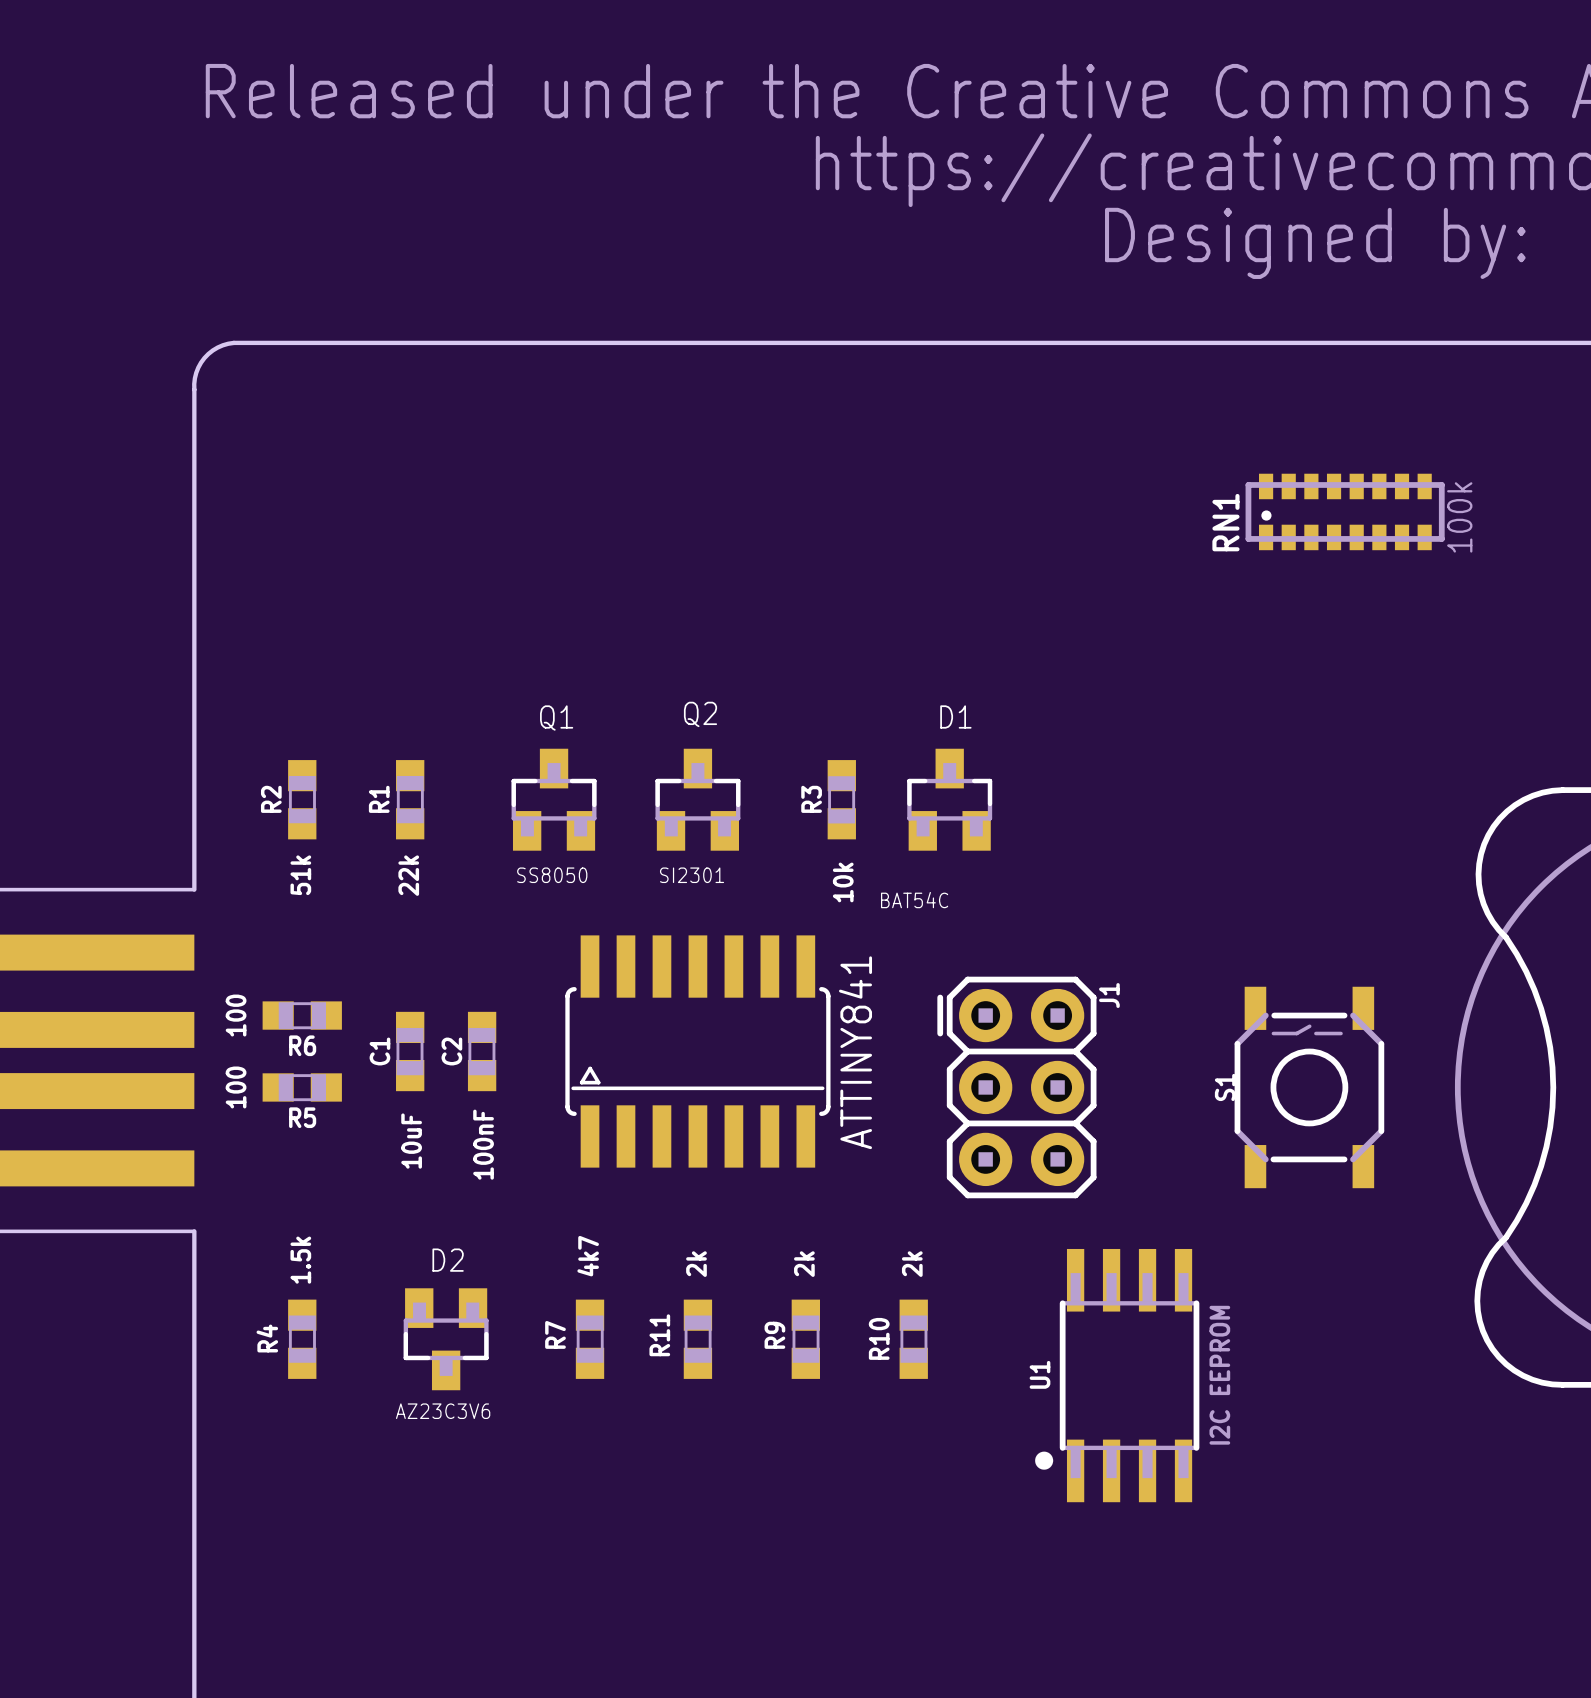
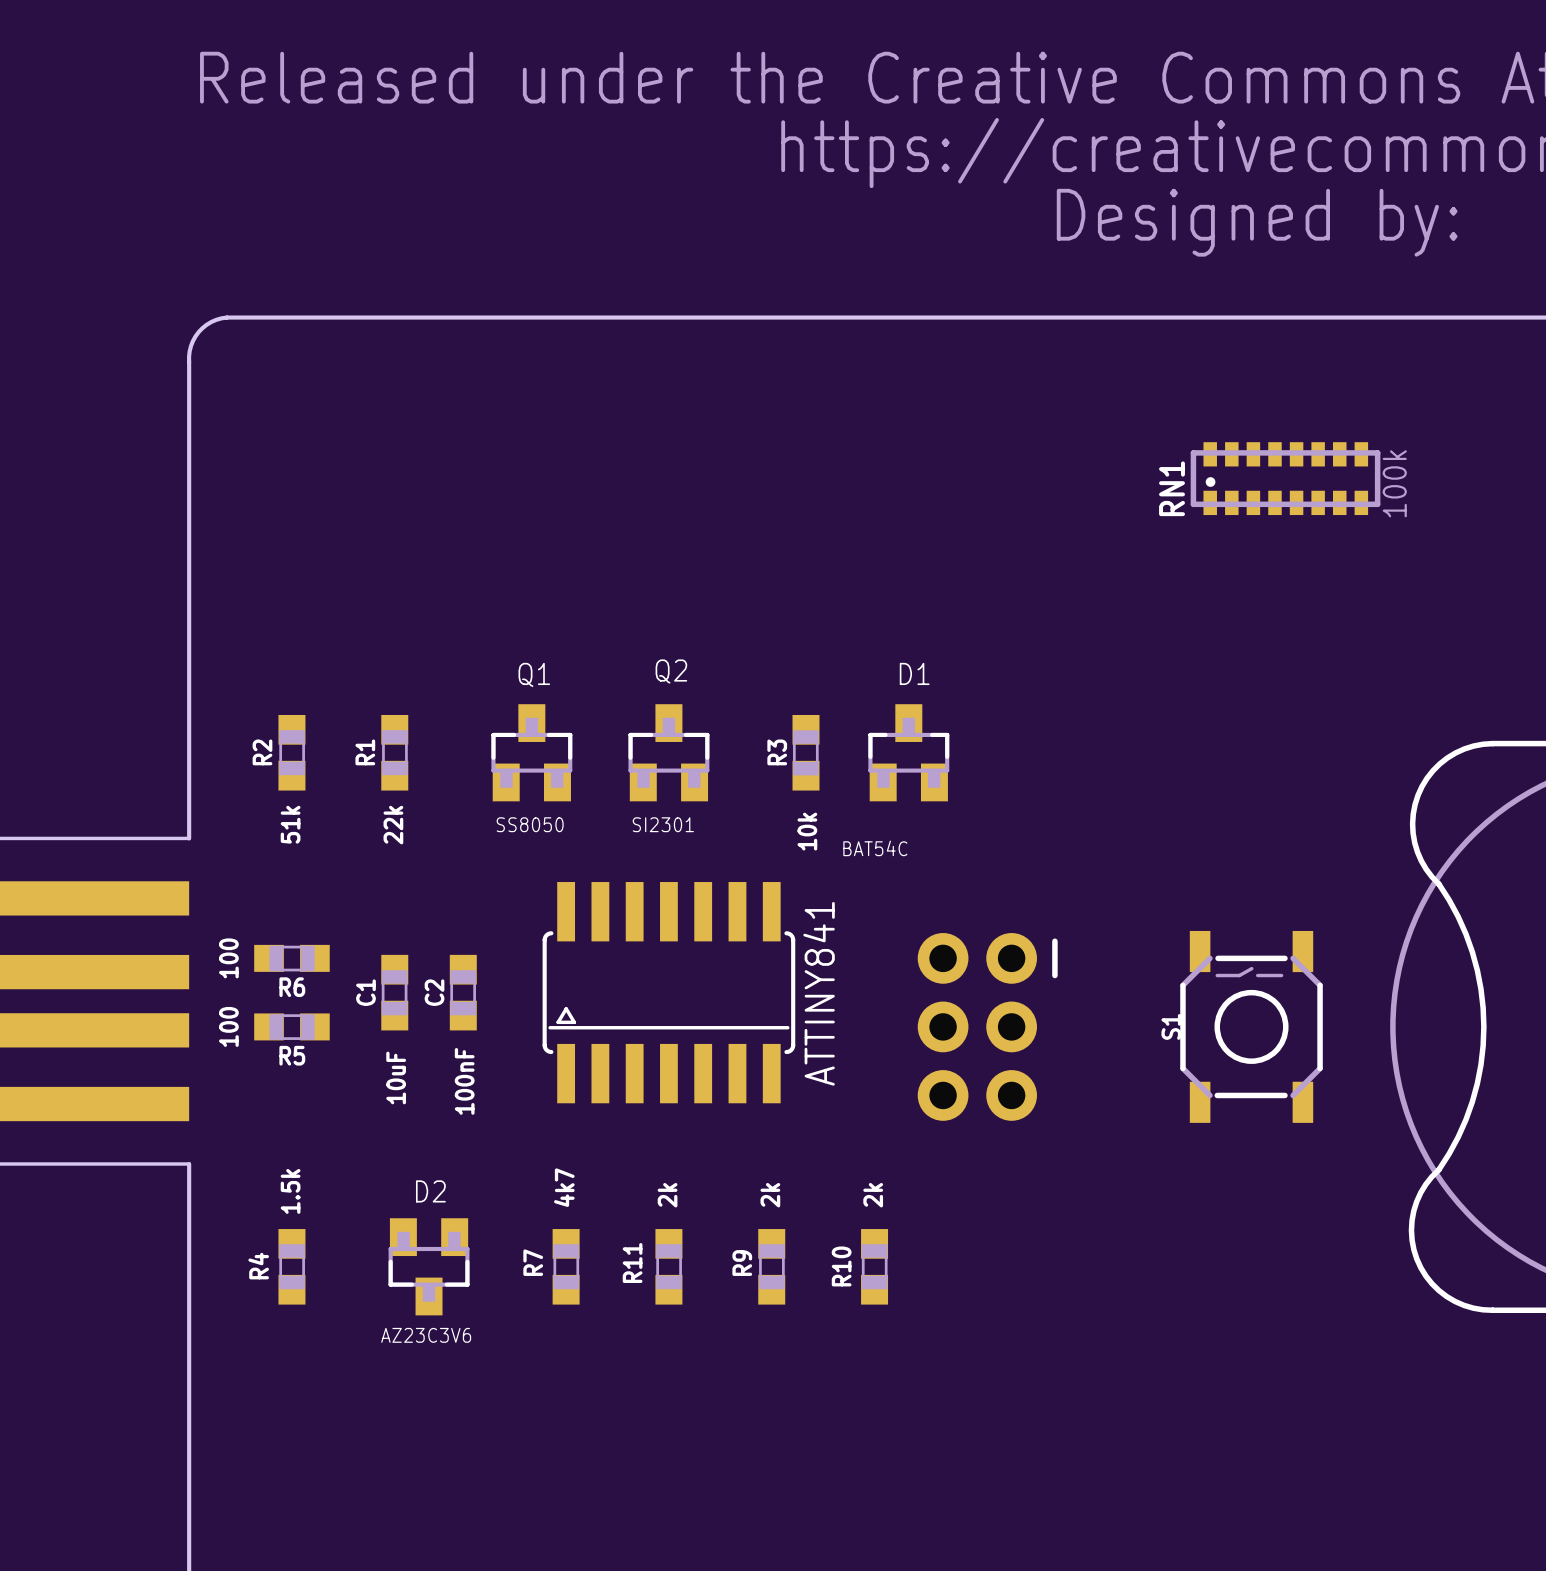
J1 side: top (1016, 1087) -> bottom (987, 1026)
U1: I2C EEPROM (1117, 1375) -> none

